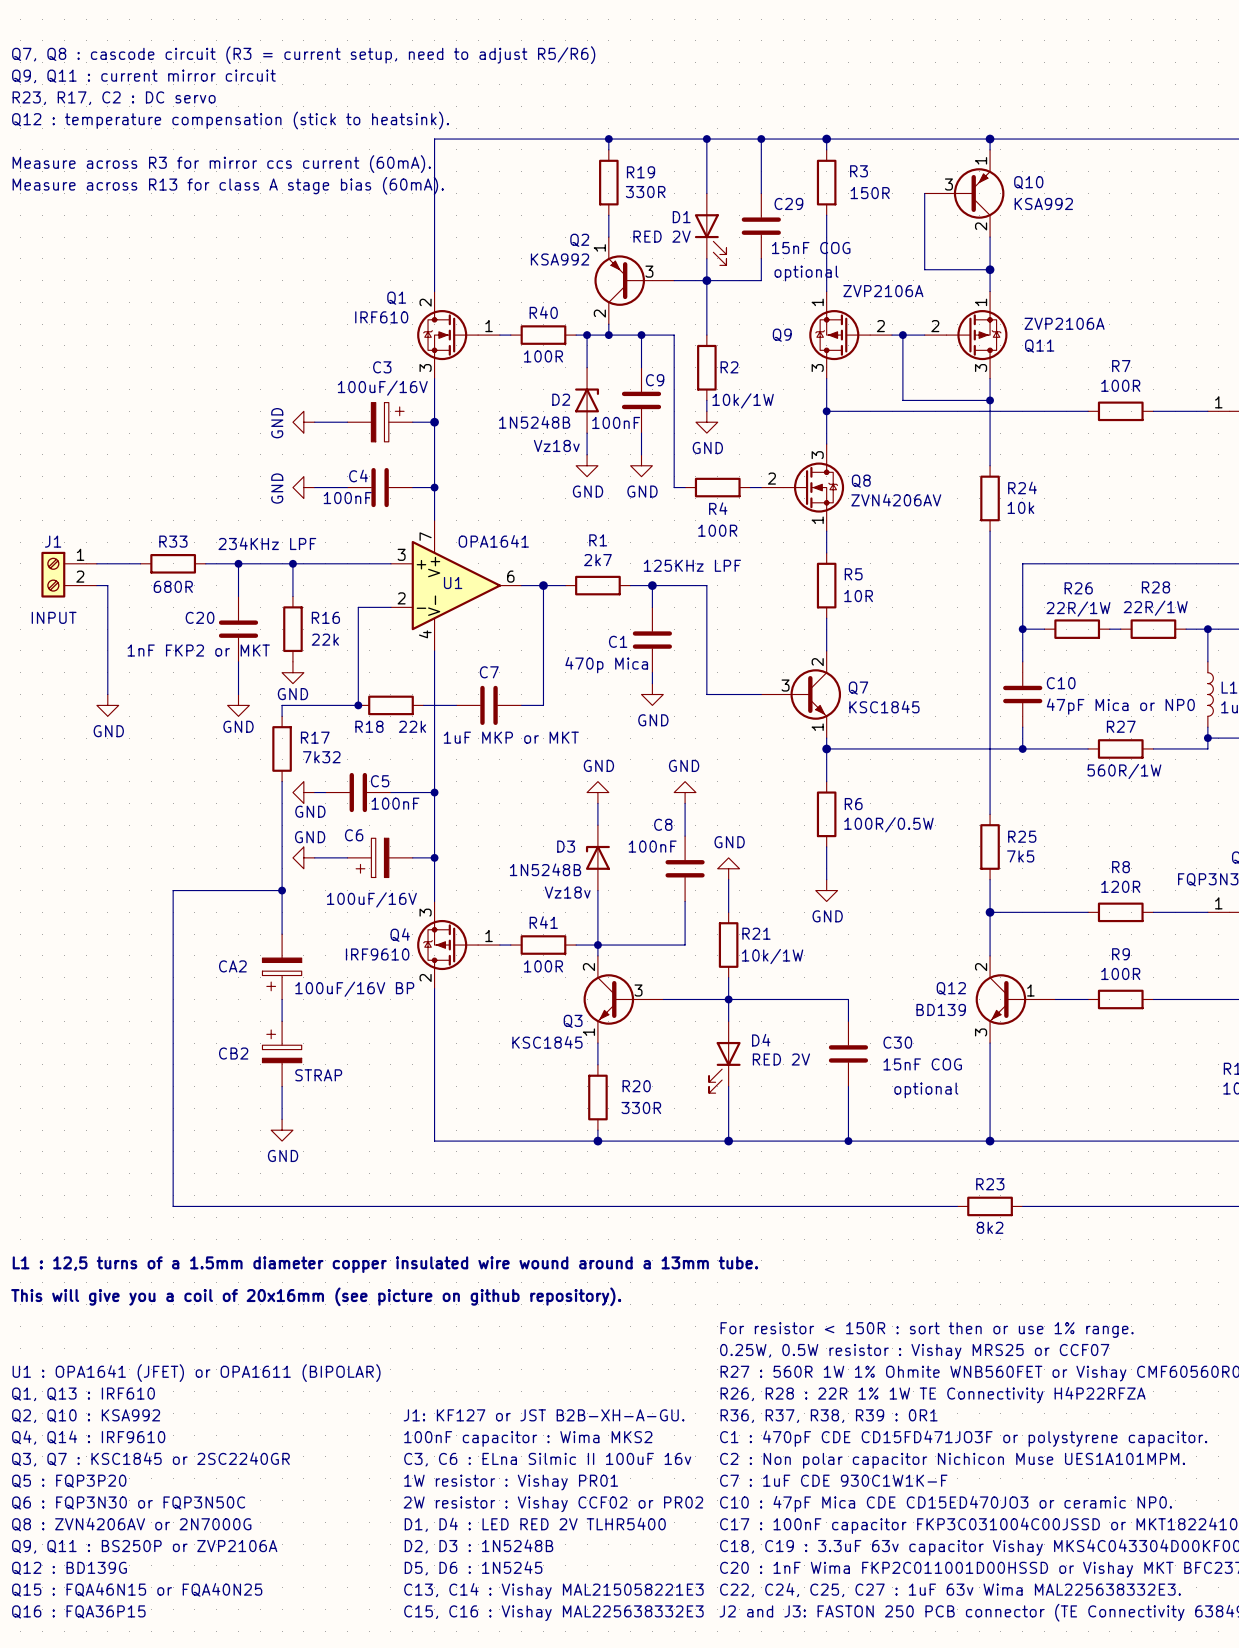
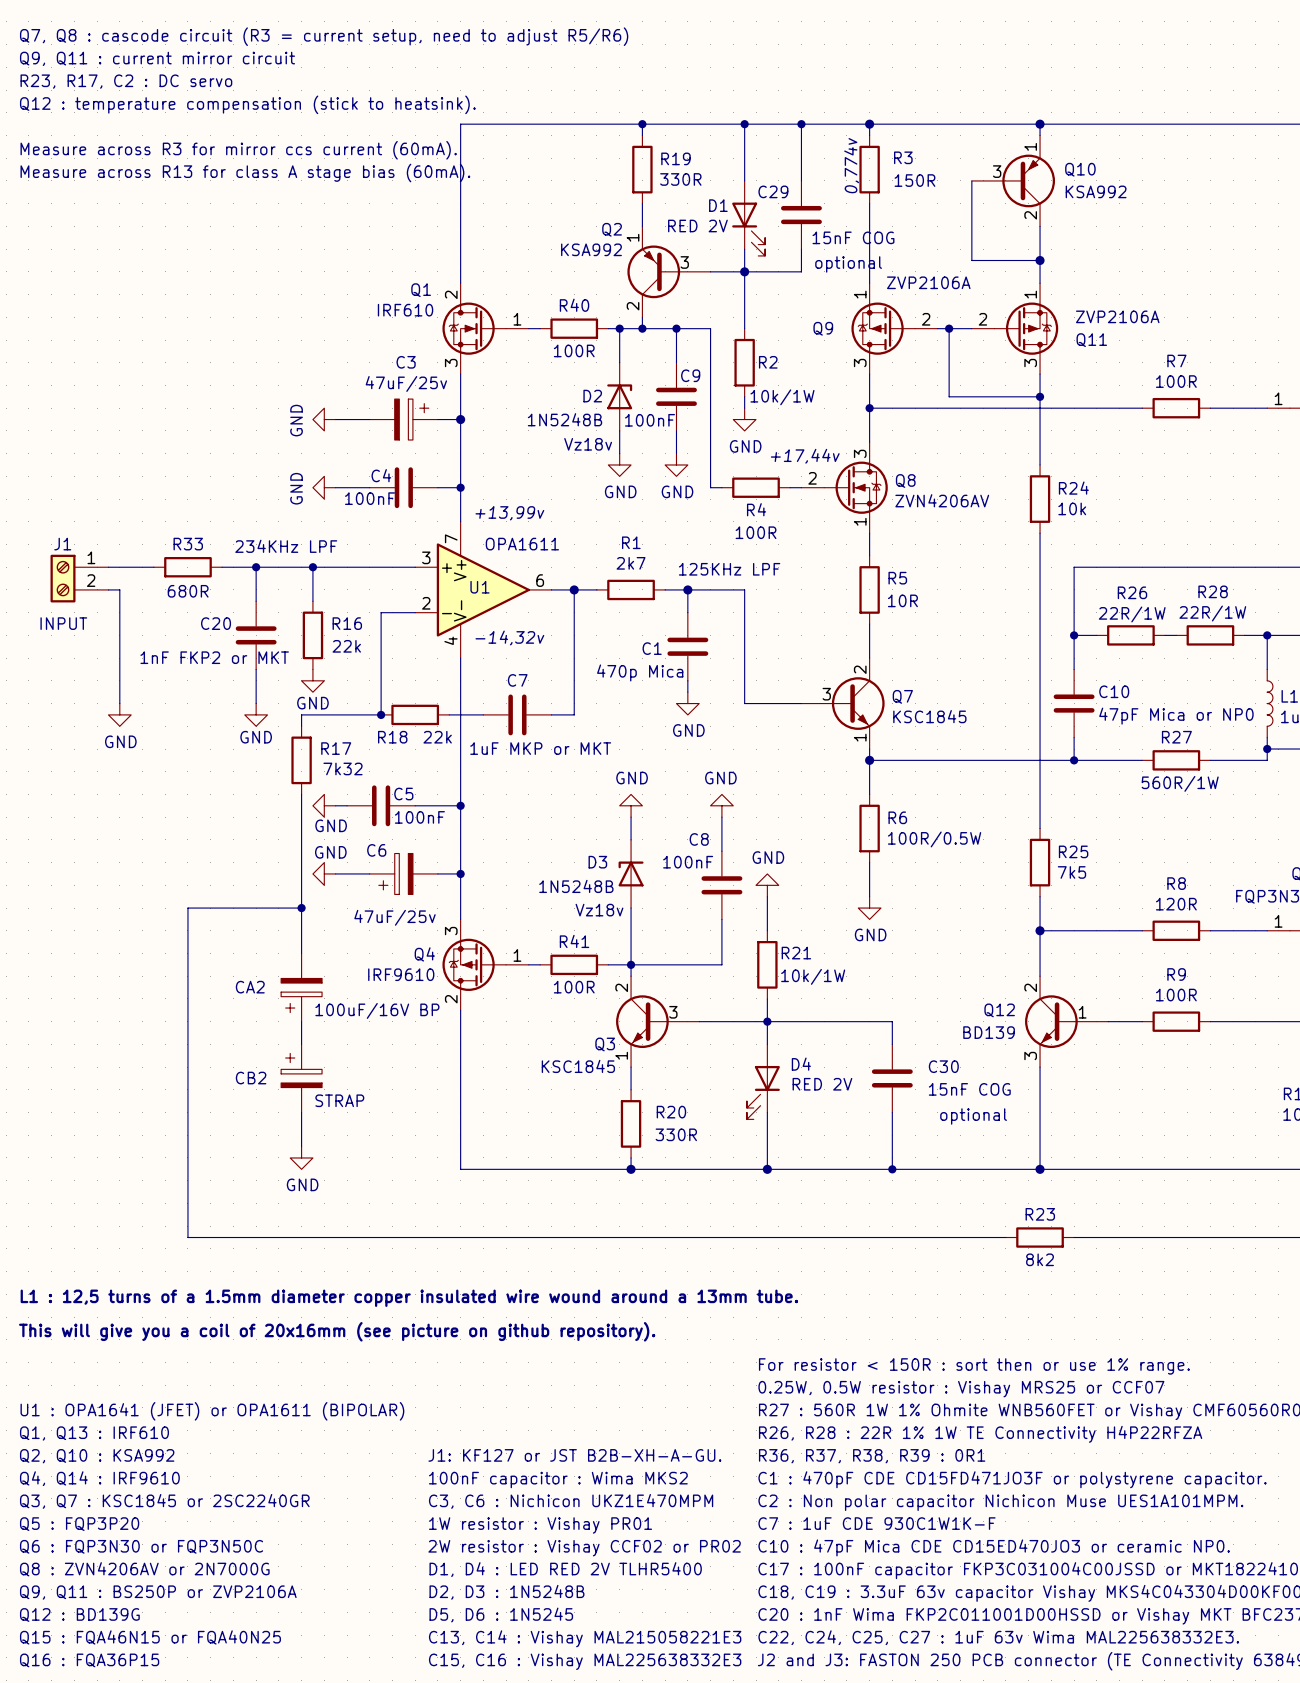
text: none -> 0,774v (851, 165)
C29 name position: C29 (788, 203) -> C29 (773, 191)
C3 value: 100uF/16V (382, 388) -> 47uF/25v (406, 383)
text: none -> +17,44v (805, 456)
text: none -> +13,99v (509, 513)
U1 value: OPA1641 (493, 541) -> OPA1611 (522, 544)
text: none -> -14,32v (509, 637)
C6 value: 100uF/16V (371, 899) -> 47uF/25v (395, 917)
text: C3, C6 : ELna Silmic II 100uF 16v (547, 1459) -> C3, C6 : Nichicon UKZ1E470MPM (571, 1501)

